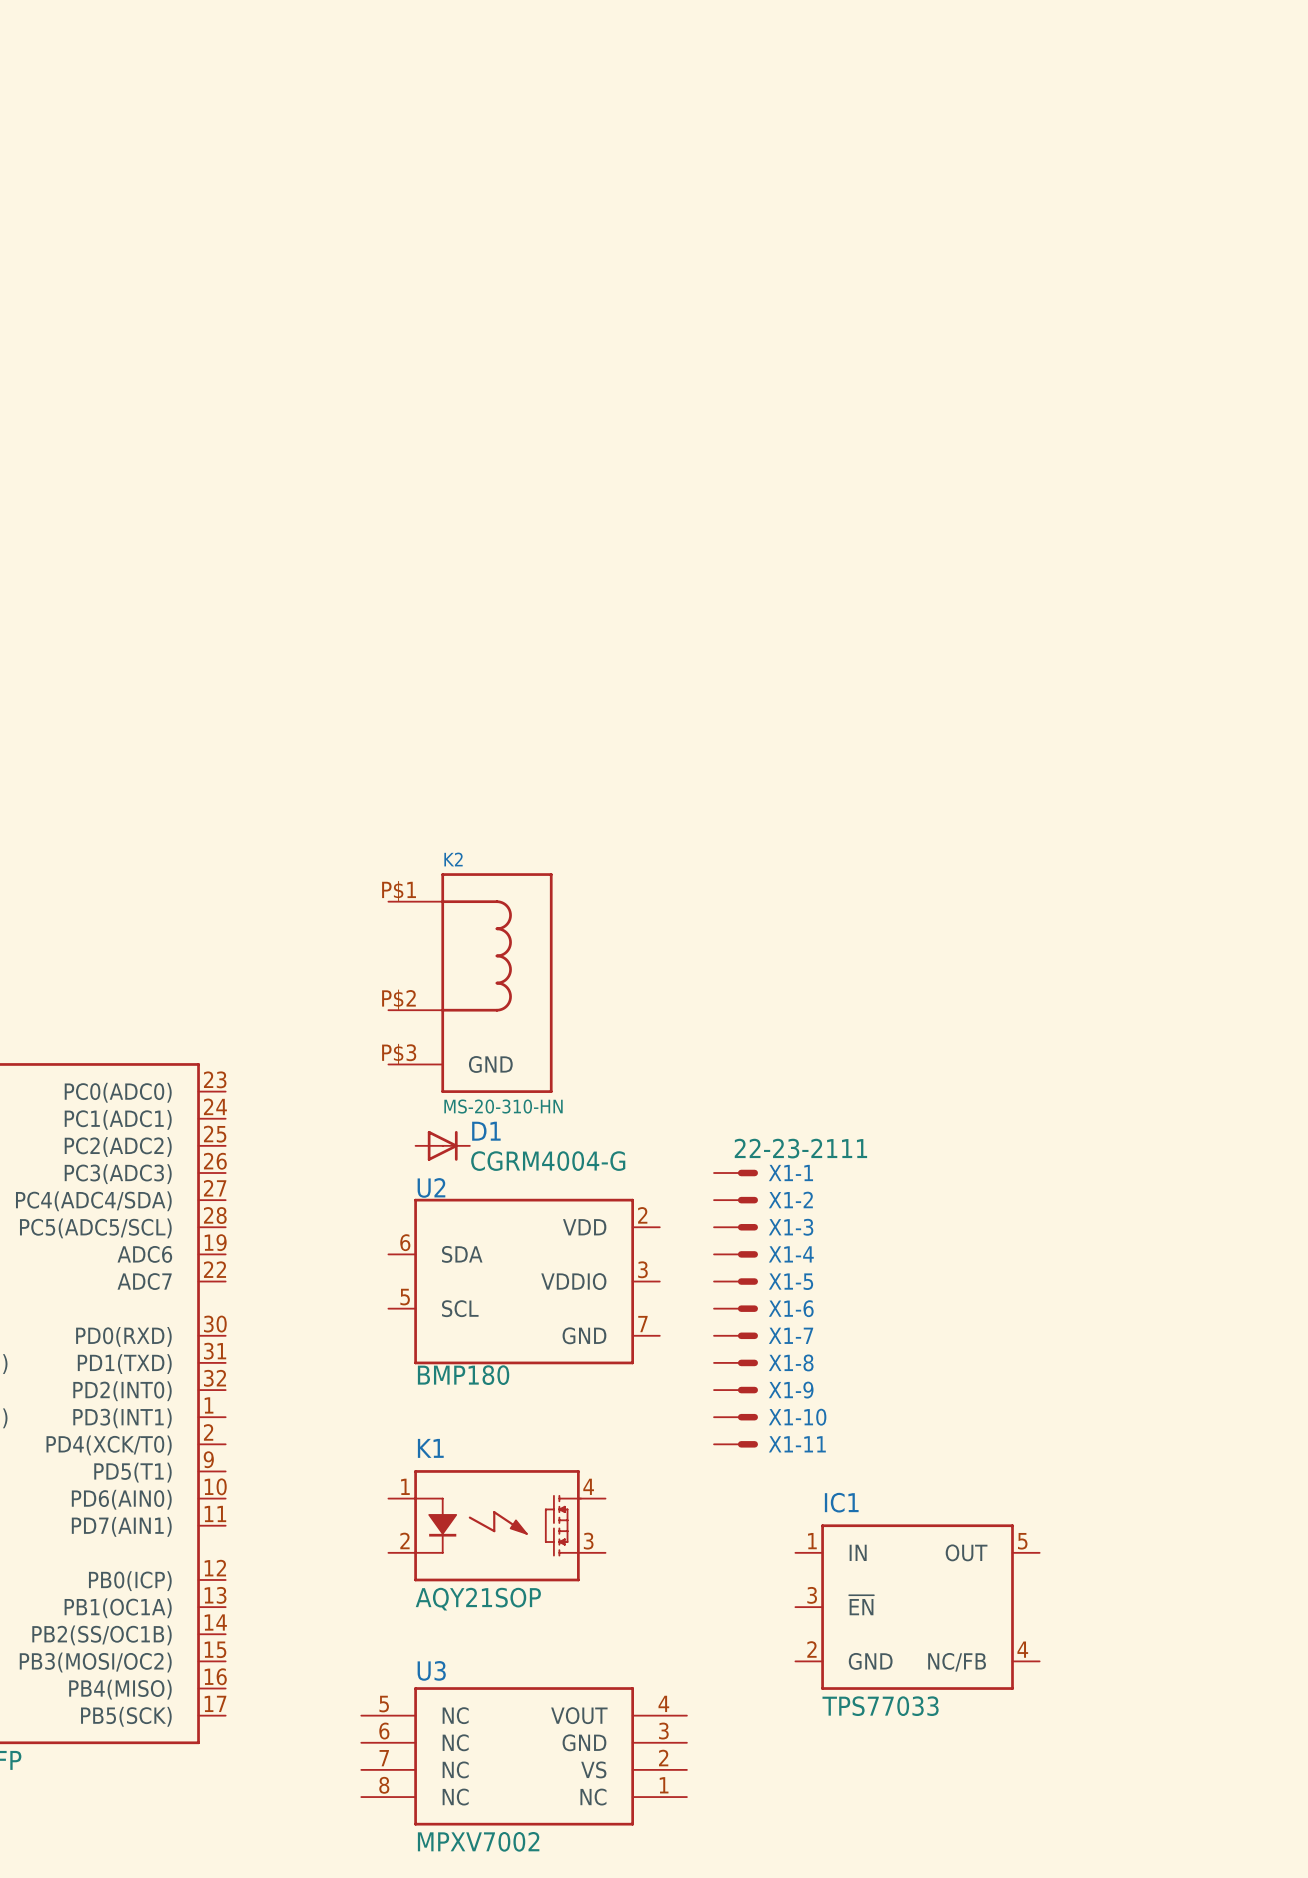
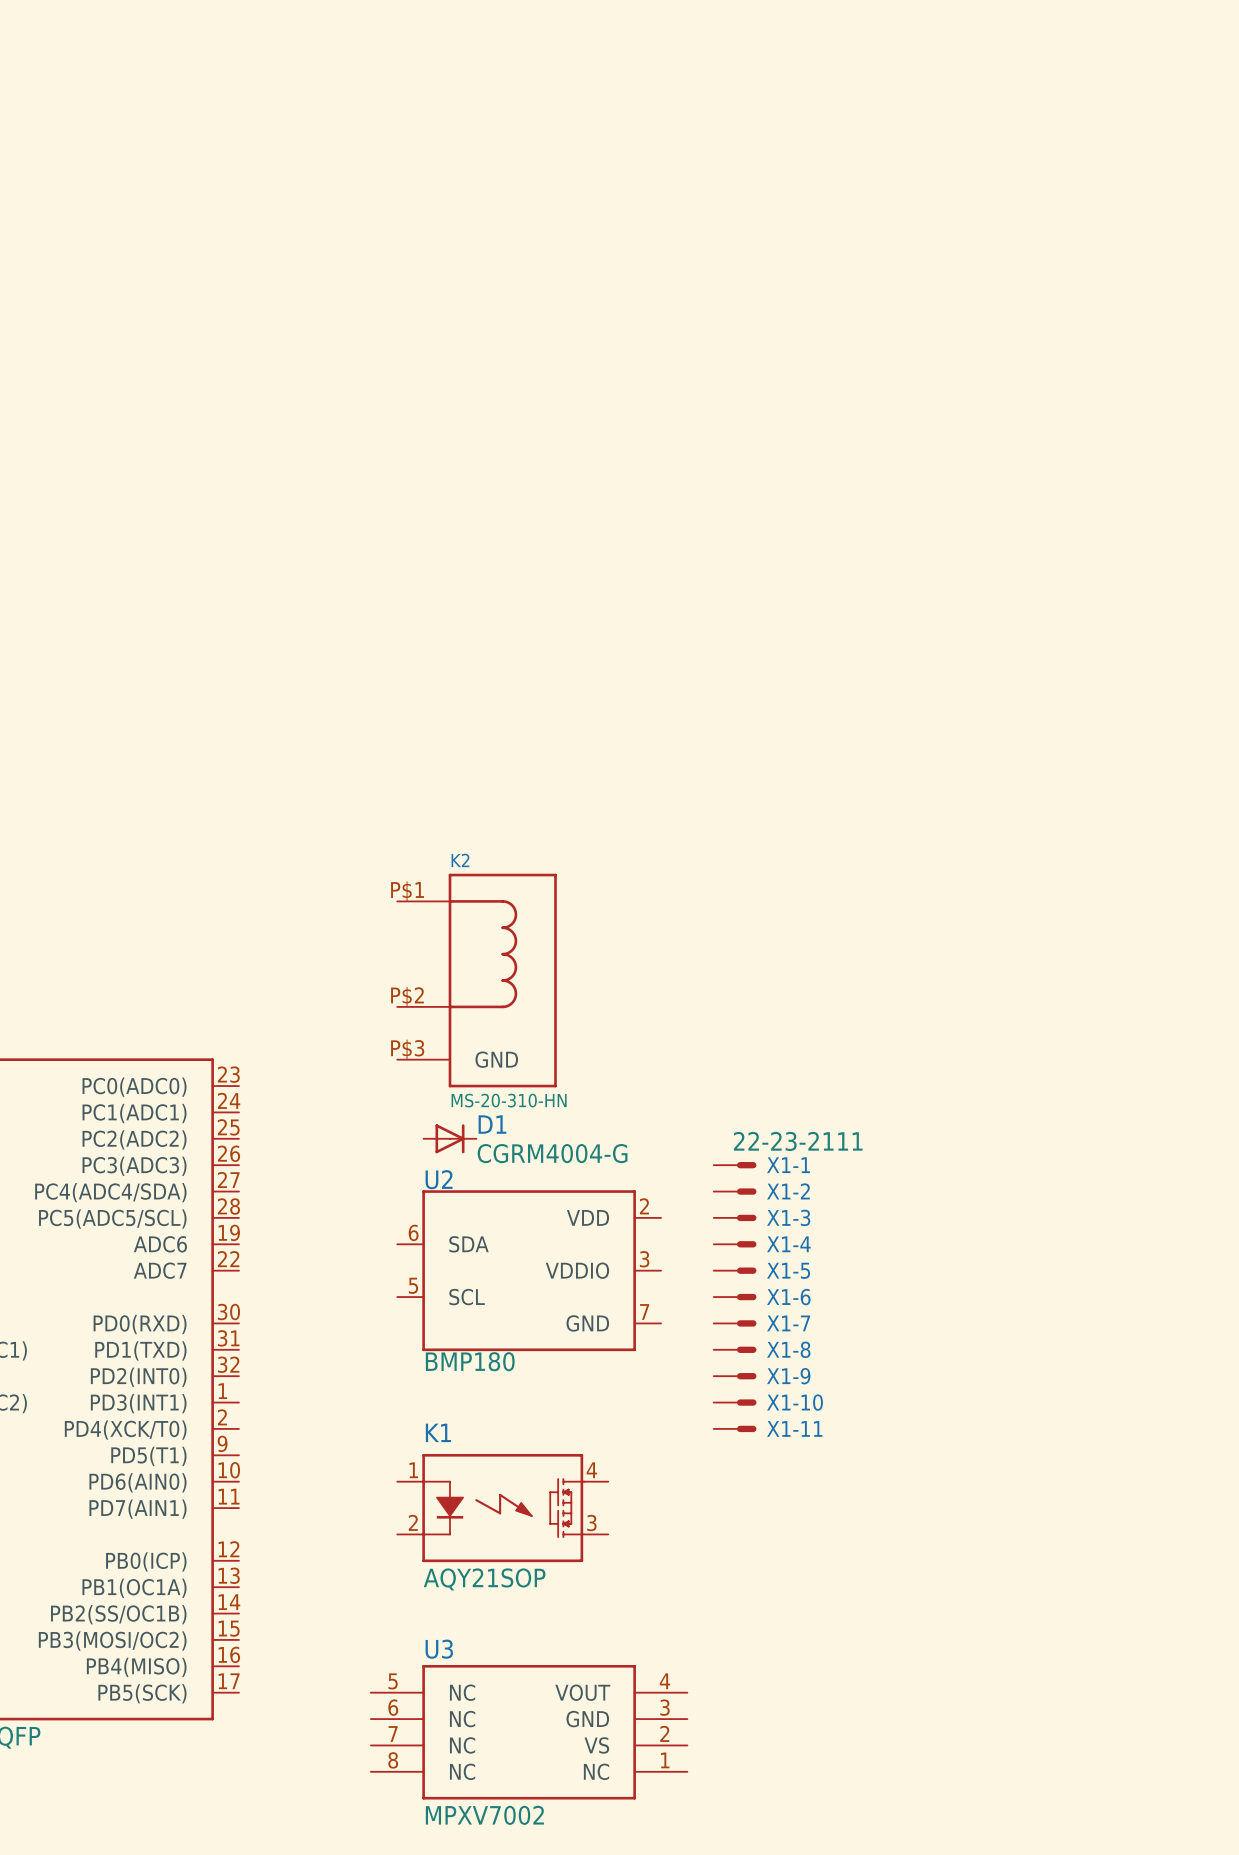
IC1: TPS77033 (917, 1607) -> none

